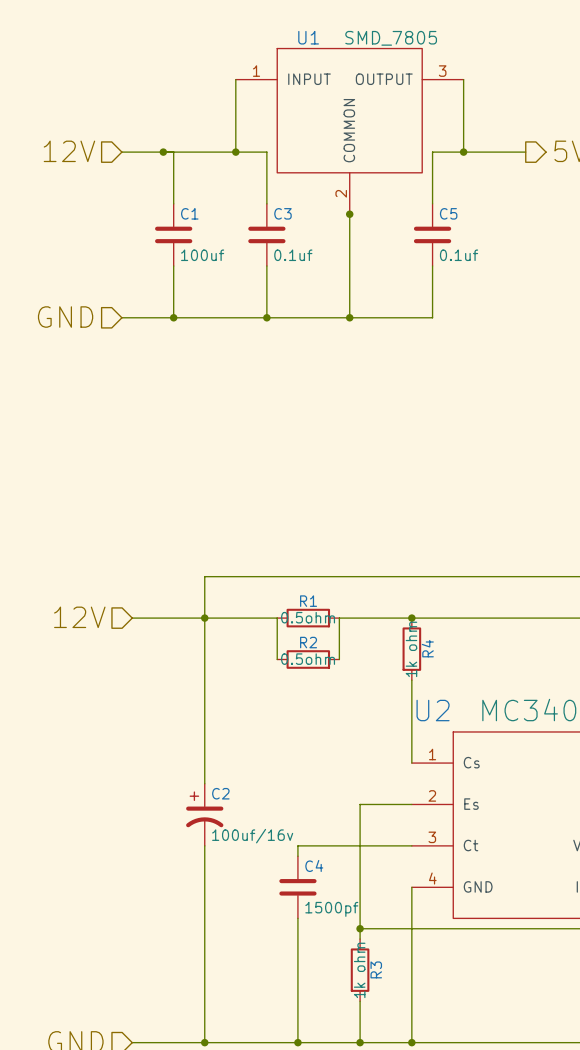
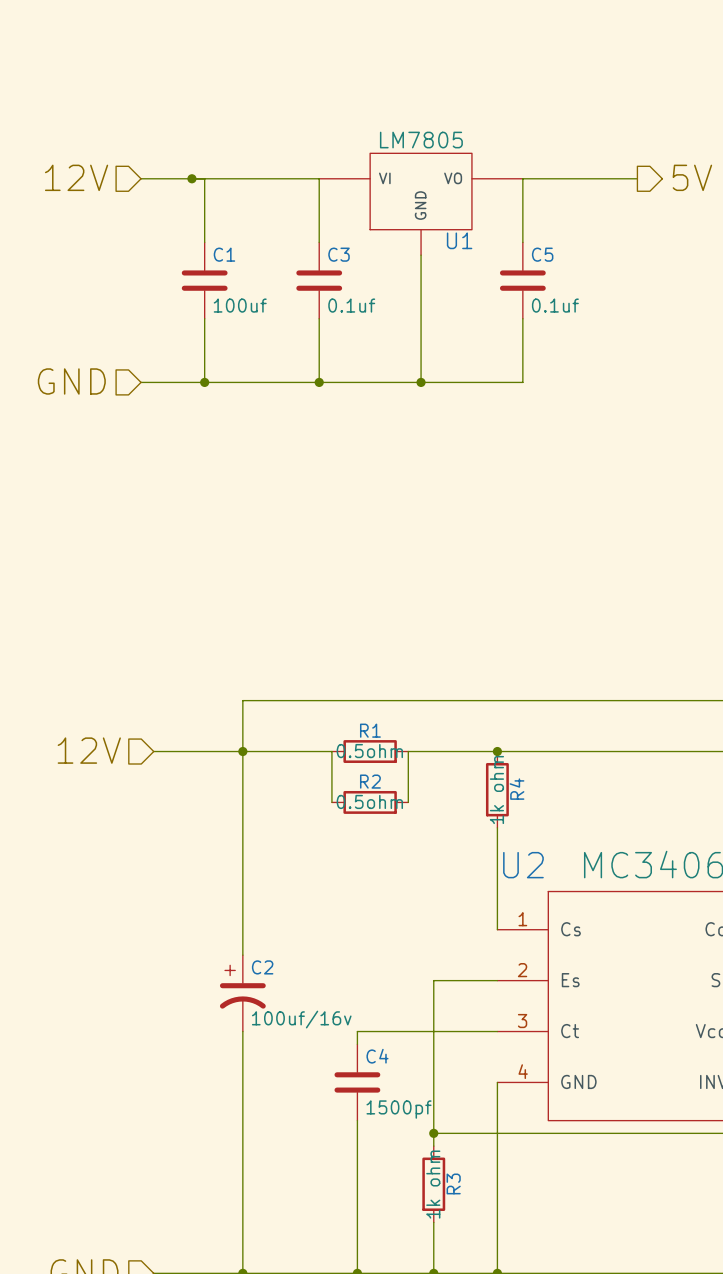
U1 name position: U1 (308, 37) -> U1 (459, 240)
U1 value: SMD_7805 (391, 38) -> LM7805 (421, 140)
U1 symbol: [235, 48, 464, 215] -> [319, 153, 523, 256]
wire: (235, 79) (235, 152) -> none
wire: (463, 79) (463, 152) -> none
junction: (235, 152) -> none
junction: (463, 152) -> none
junction: (349, 214) -> none

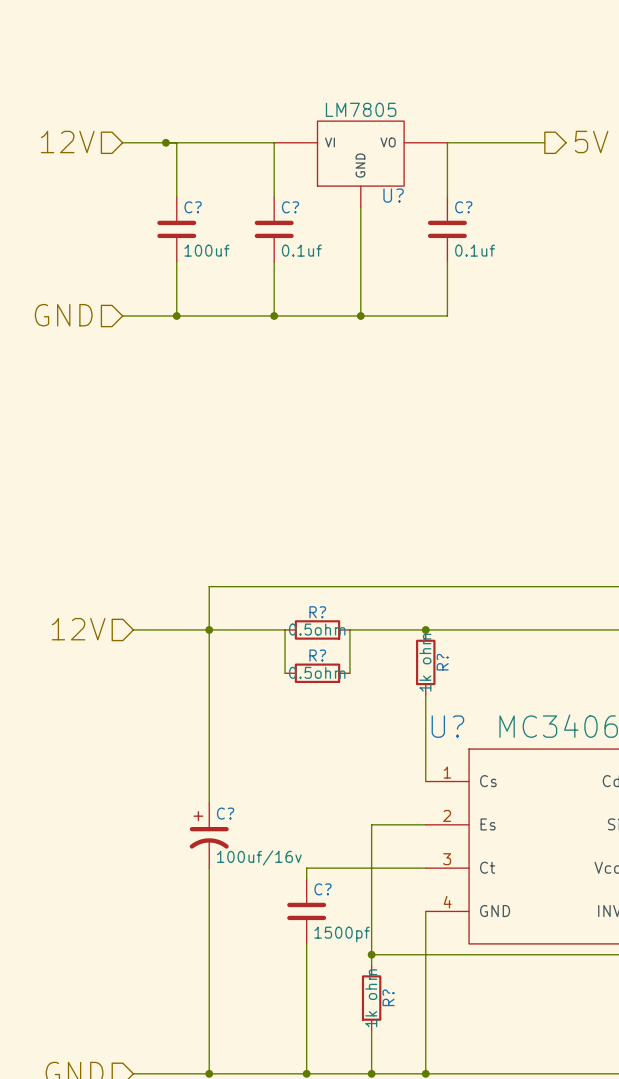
U1 name: U1 (459, 240) -> U? (393, 195)
C1 name: C1 (224, 254) -> C? (193, 207)
C3 name: C3 (339, 254) -> C? (290, 207)
C5 name: C5 (542, 254) -> C? (463, 207)
R1 name: R1 (370, 730) -> R? (317, 612)
R2 name: R2 (370, 781) -> R? (317, 655)
R4 name: R4 (516, 789) -> R? (442, 662)
U2 name: U2 (523, 865) -> U? (447, 726)
C2 name: C2 (262, 967) -> C? (225, 813)
C4 name: C4 (377, 1056) -> C? (322, 889)
R3 name: R3 (453, 1183) -> R? (388, 997)

